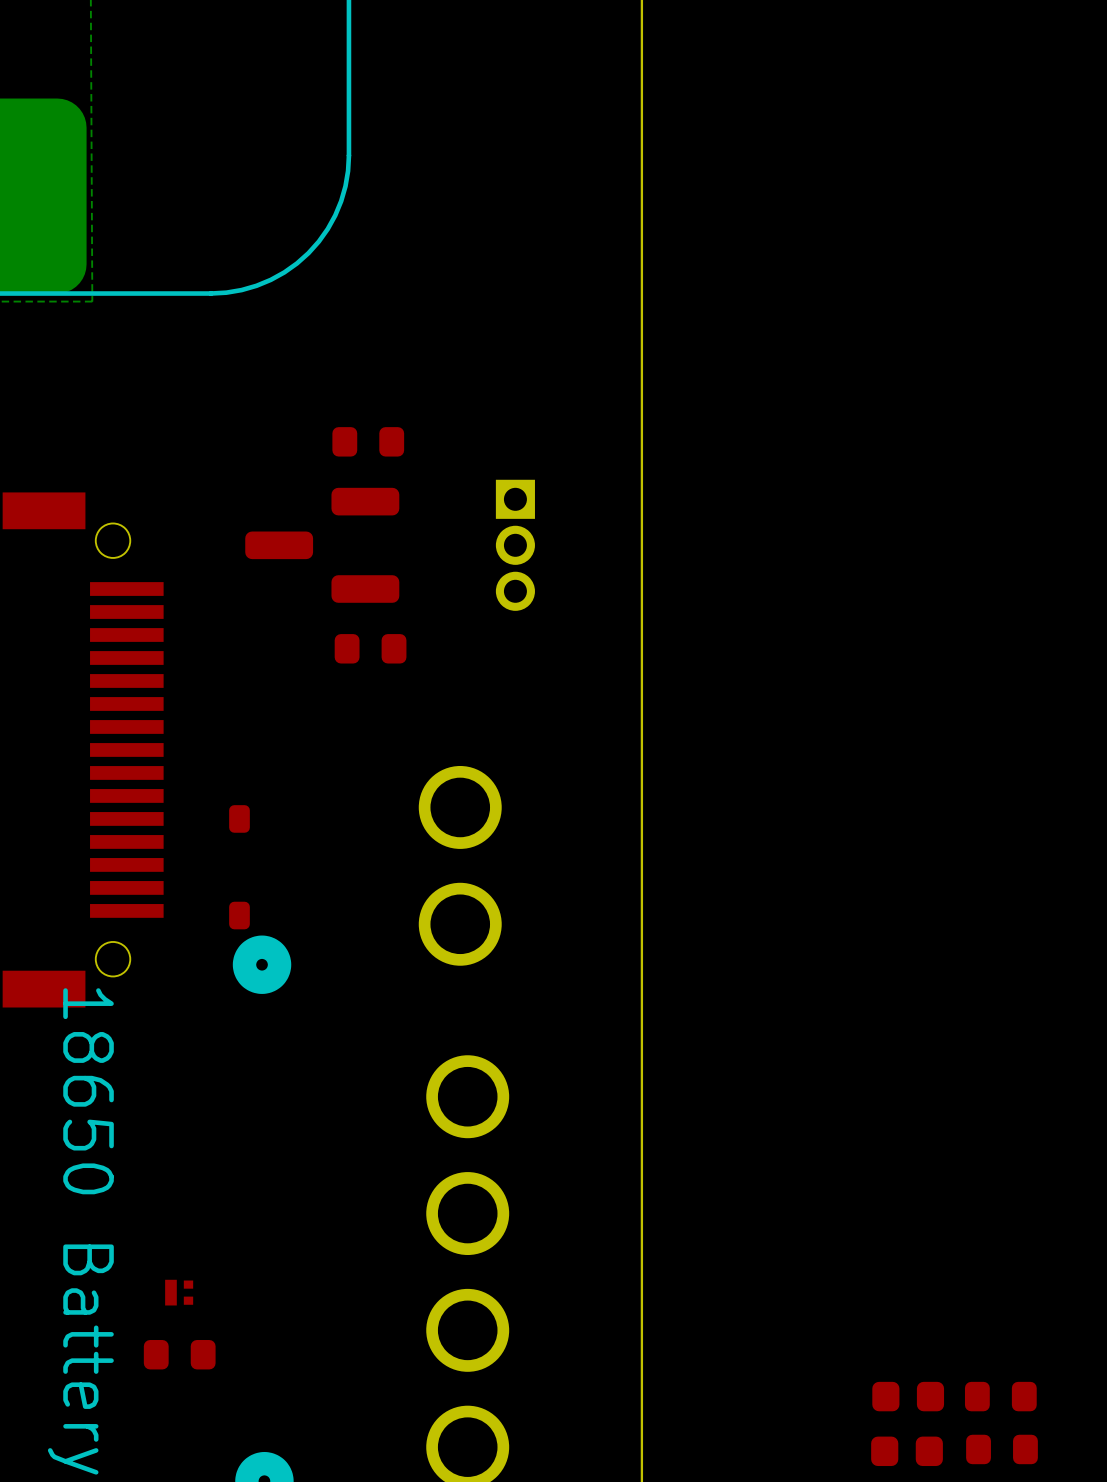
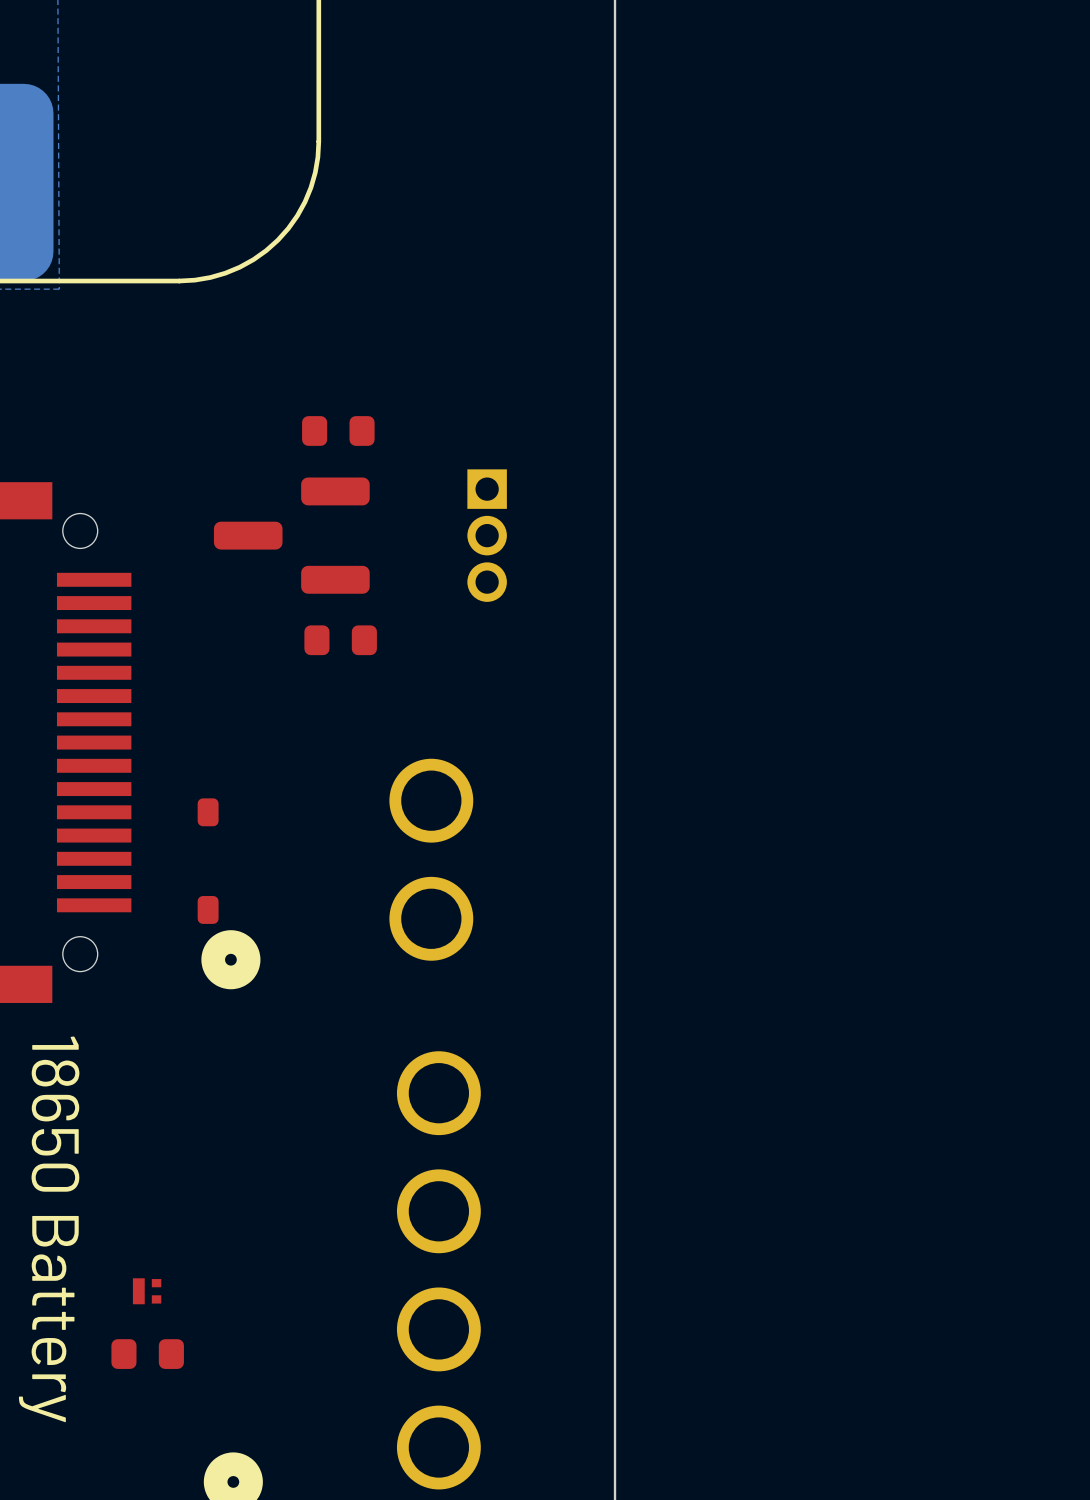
part: (908, 1396) -> none
part: (1000, 1396) -> none
part: (1001, 1449) -> none
part: (907, 1451) -> none

